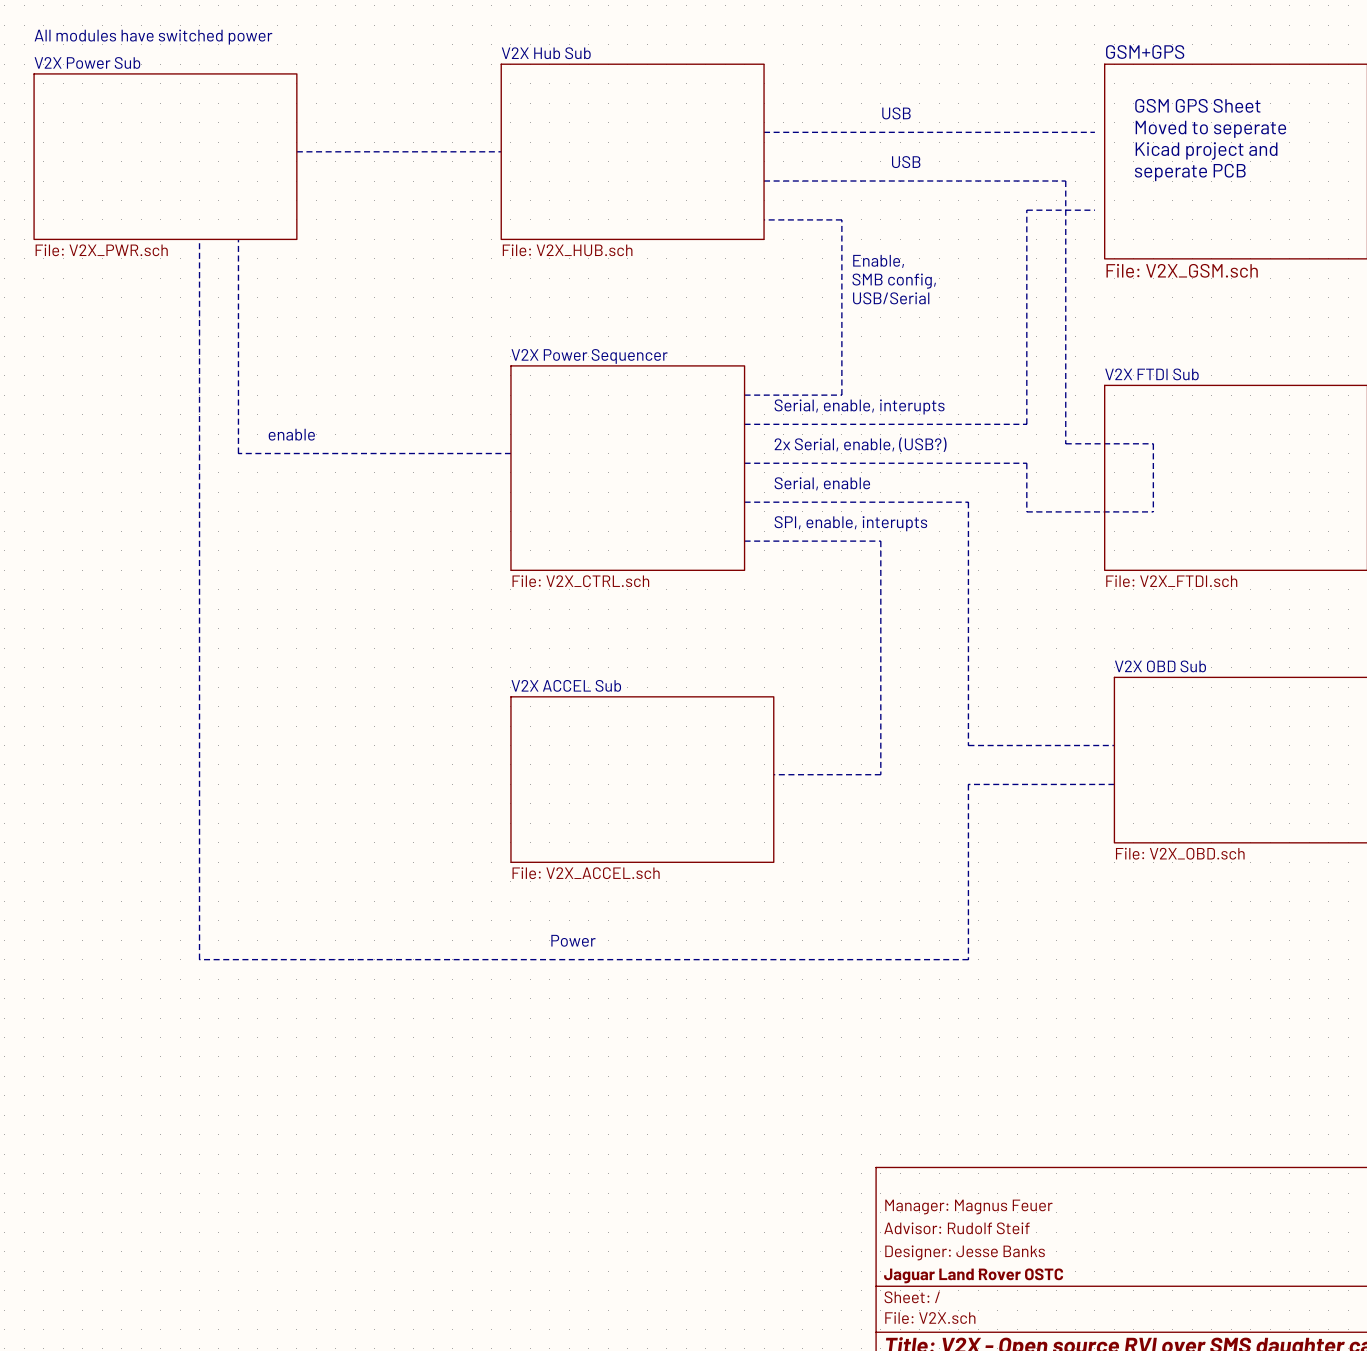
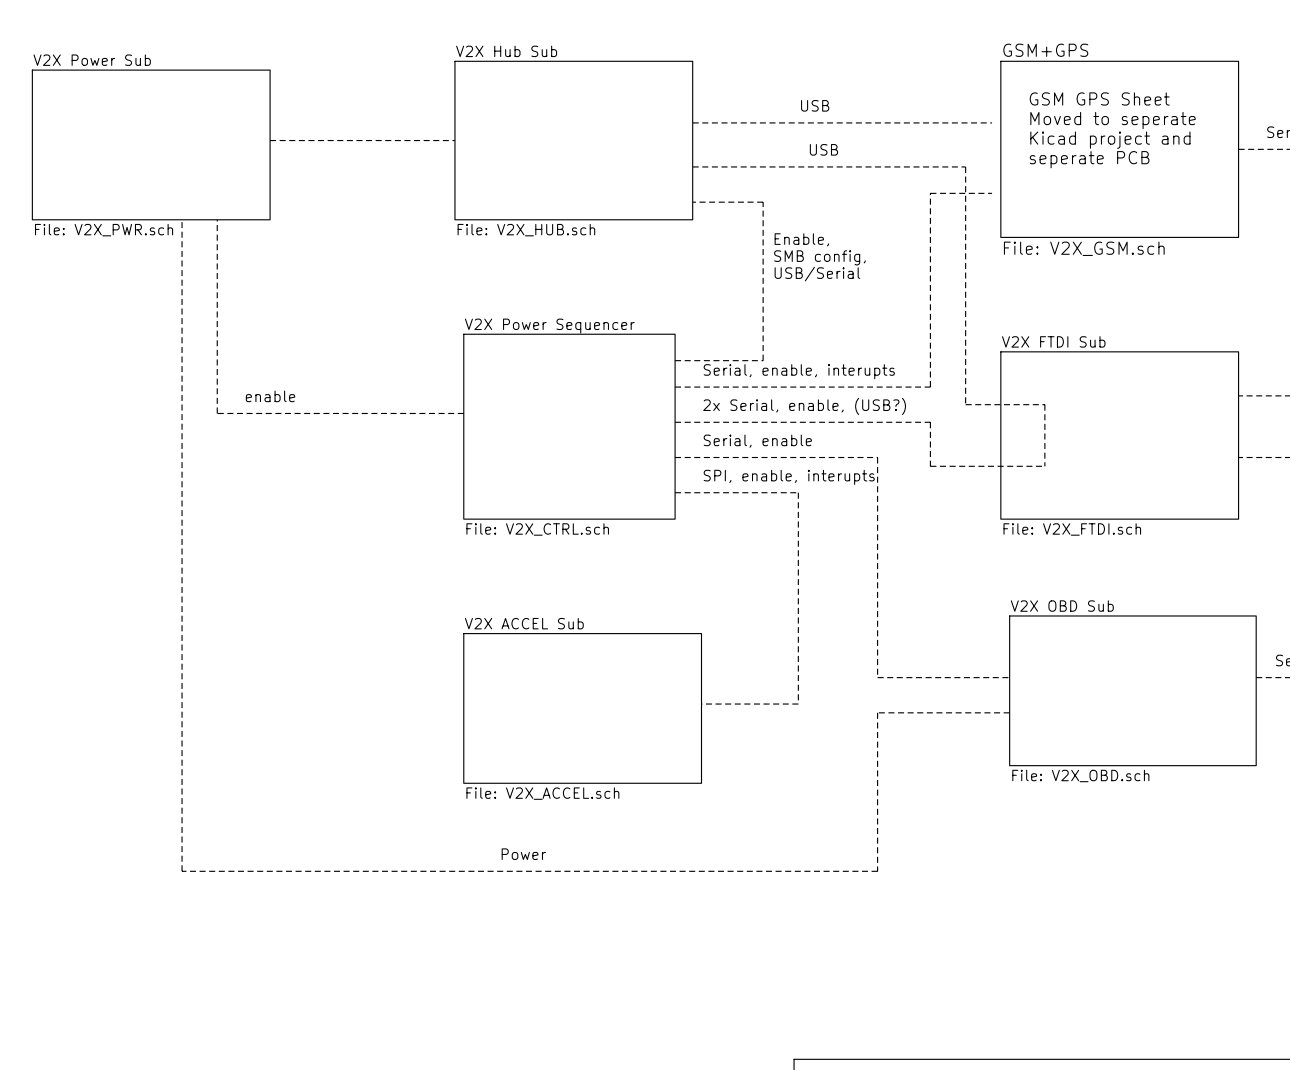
text: All modules have switched power (153, 37) -> none

